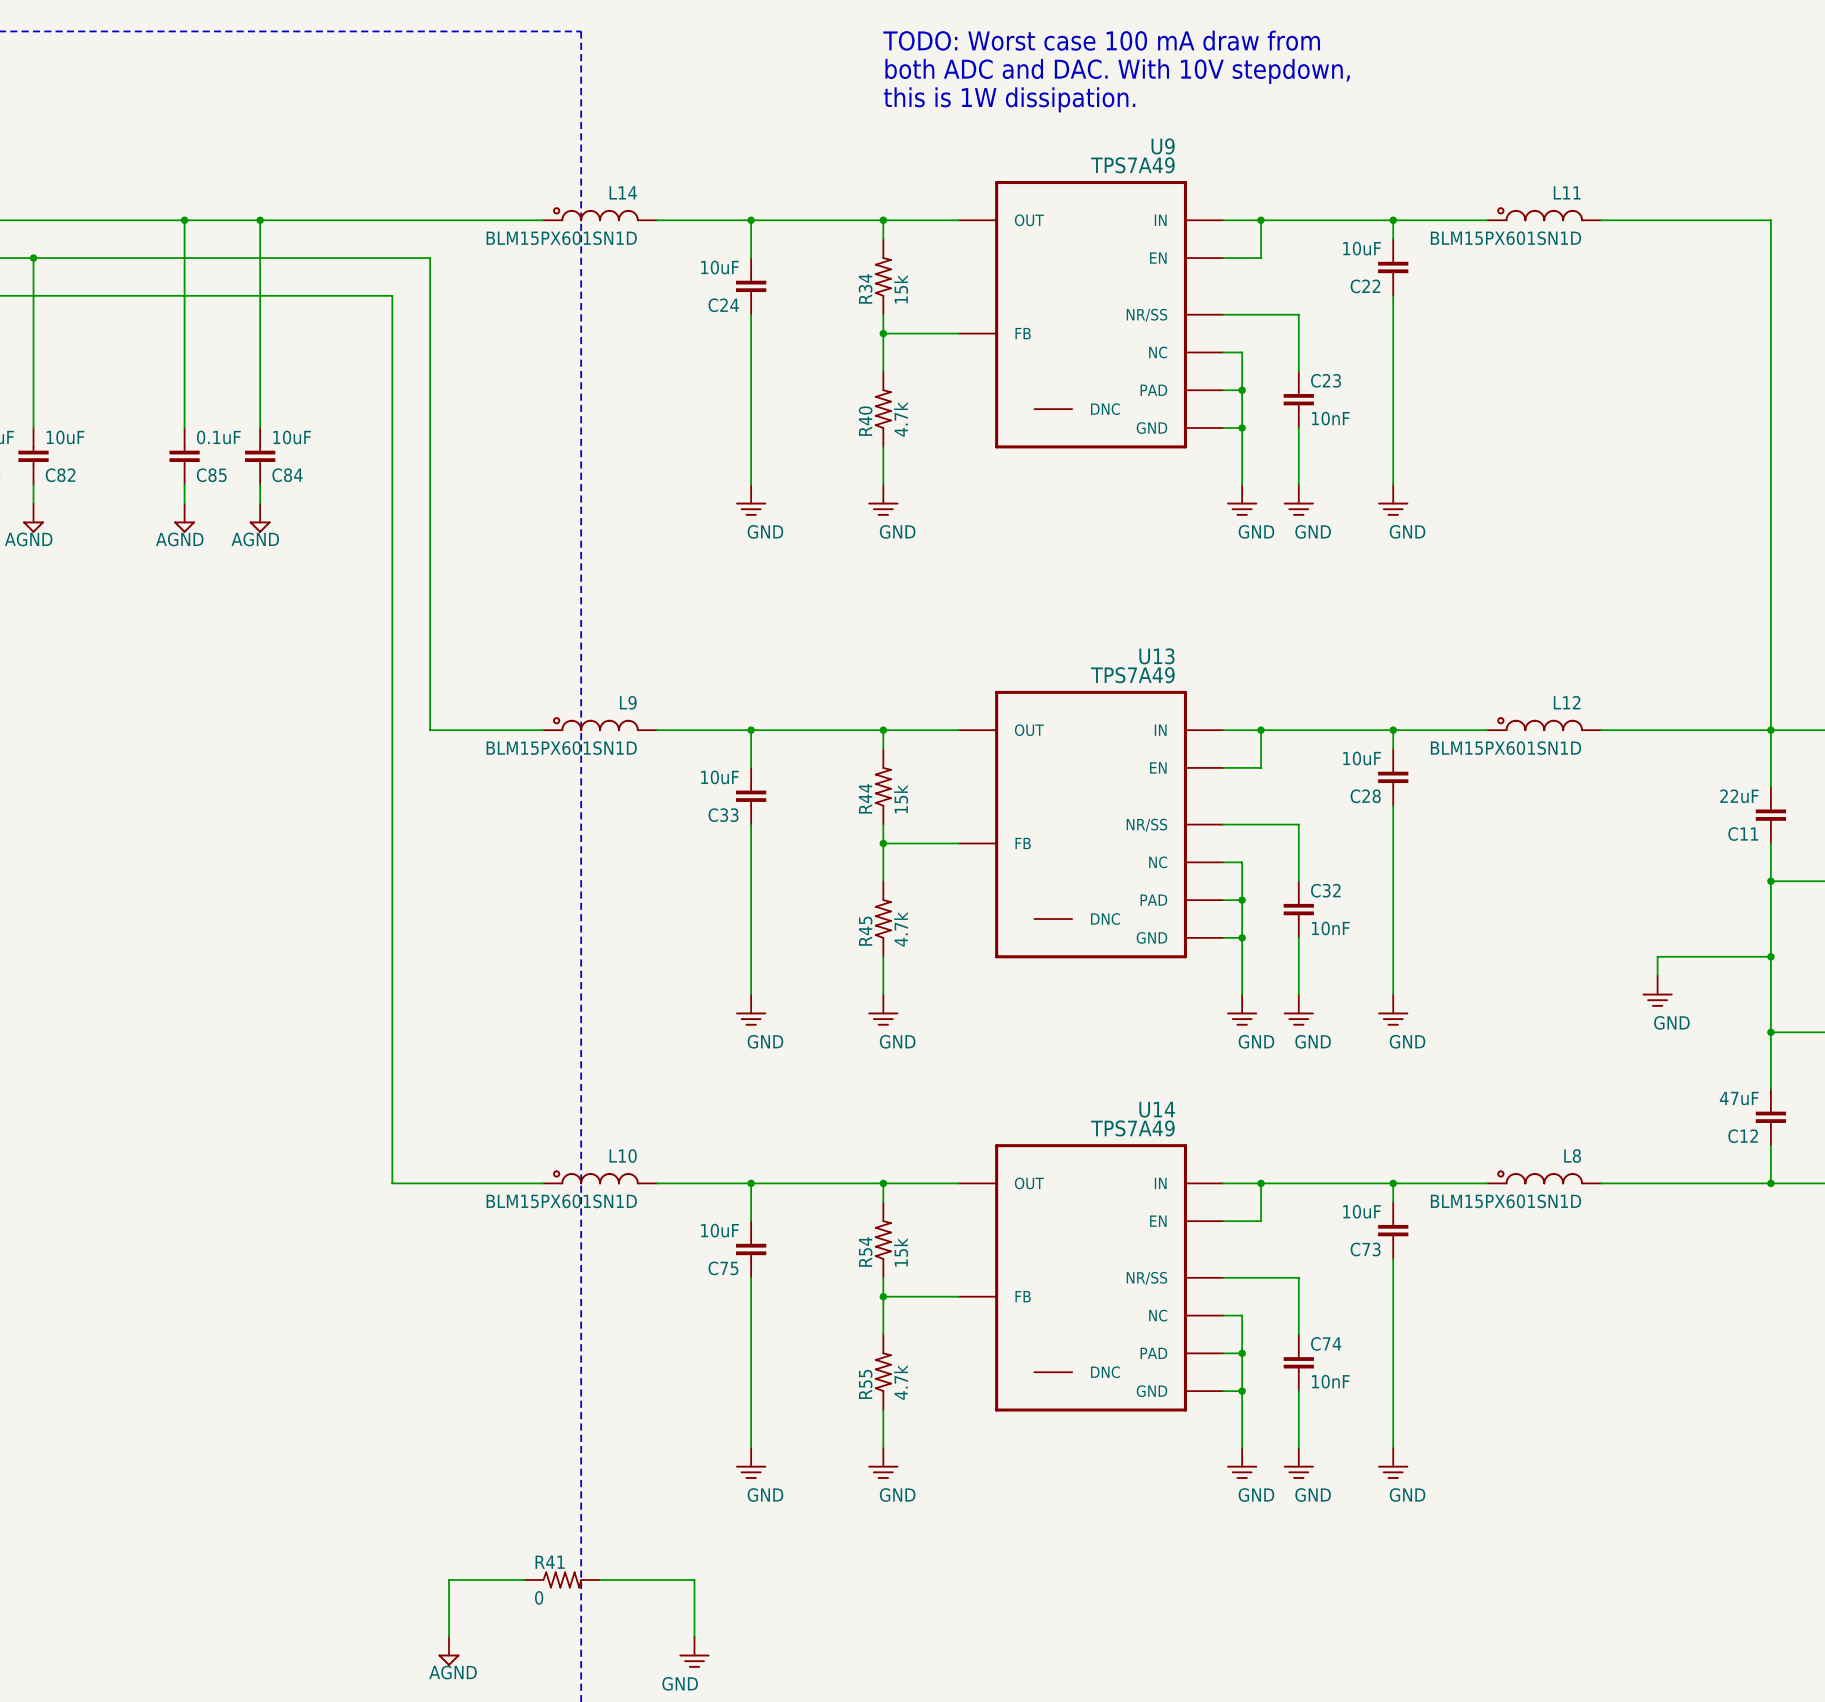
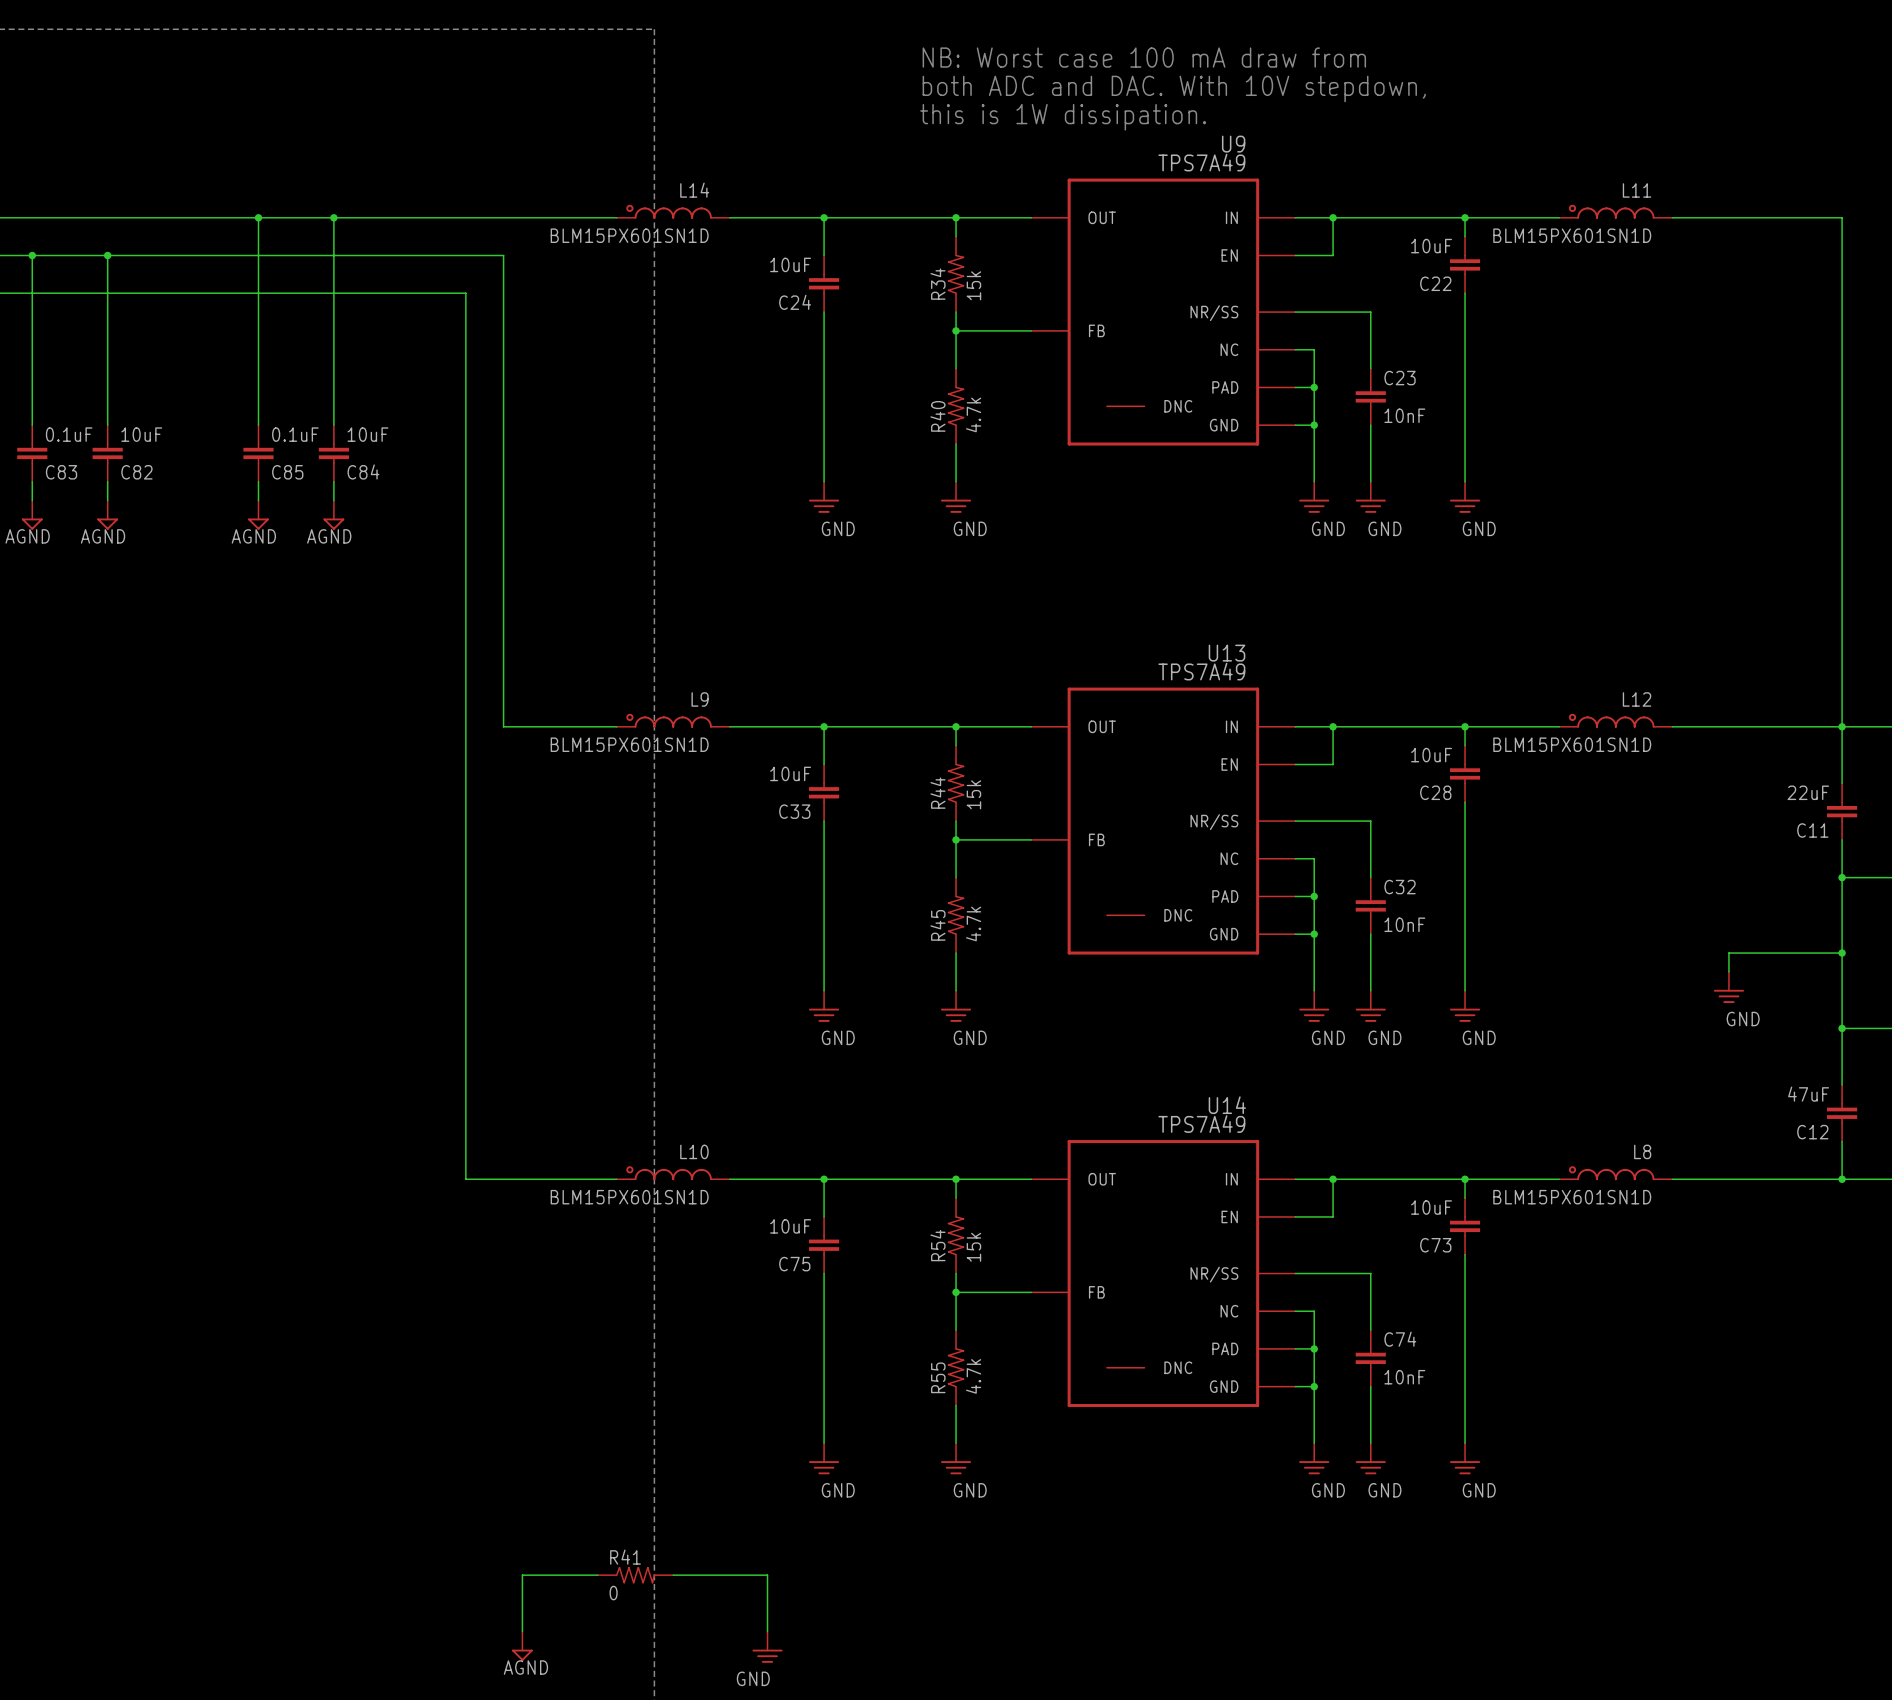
text: TODO: Worst case 100 mA draw from (1101, 40) -> NB: Worst case 100 mA draw from (1144, 57)
text position: both ADC and DAC. With 10V stepdown, (1117, 71) -> both ADC and DAC. With 10V stepdown, (1174, 88)
text position: this is 1W dissipation. (1009, 99) -> this is 1W dissipation. (1063, 117)

